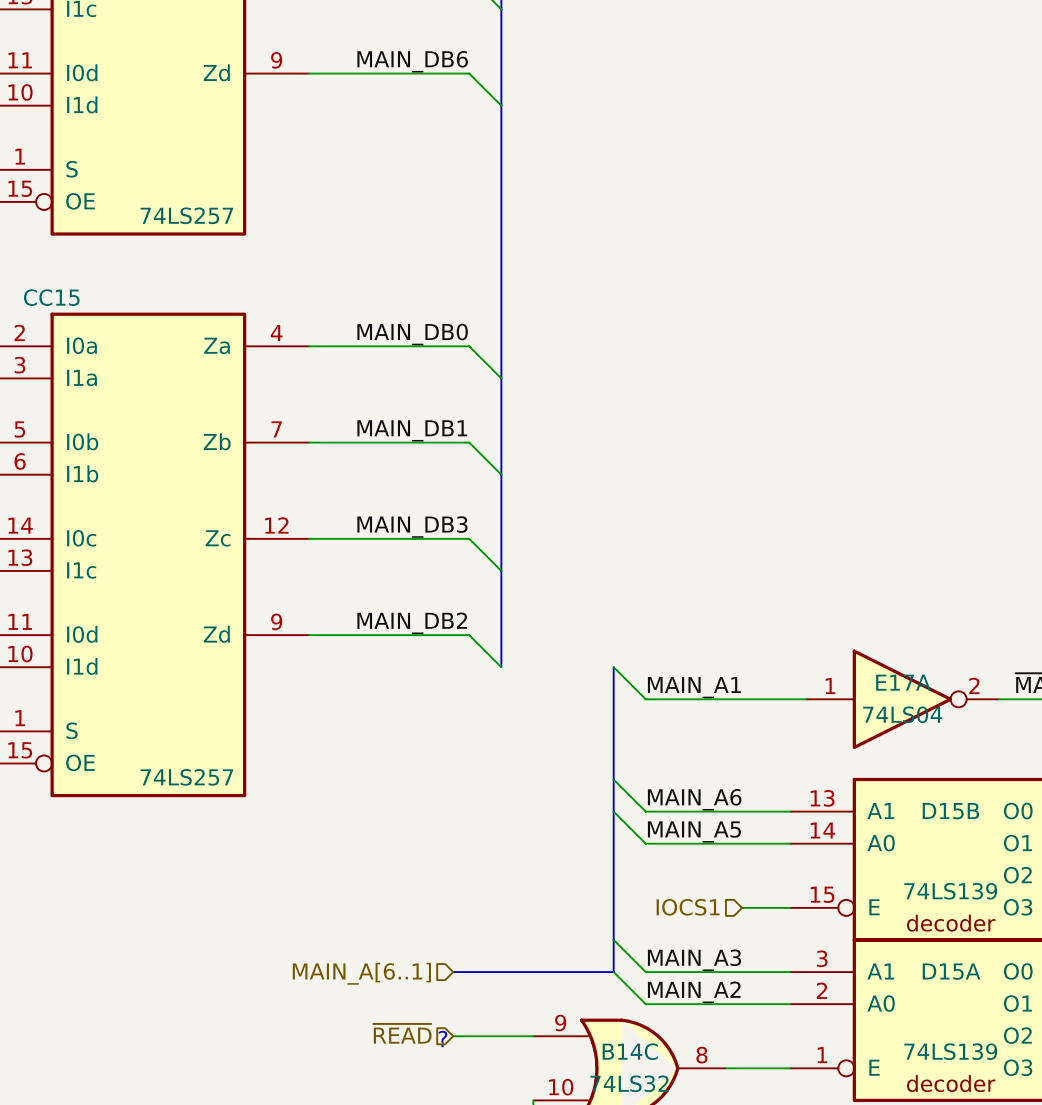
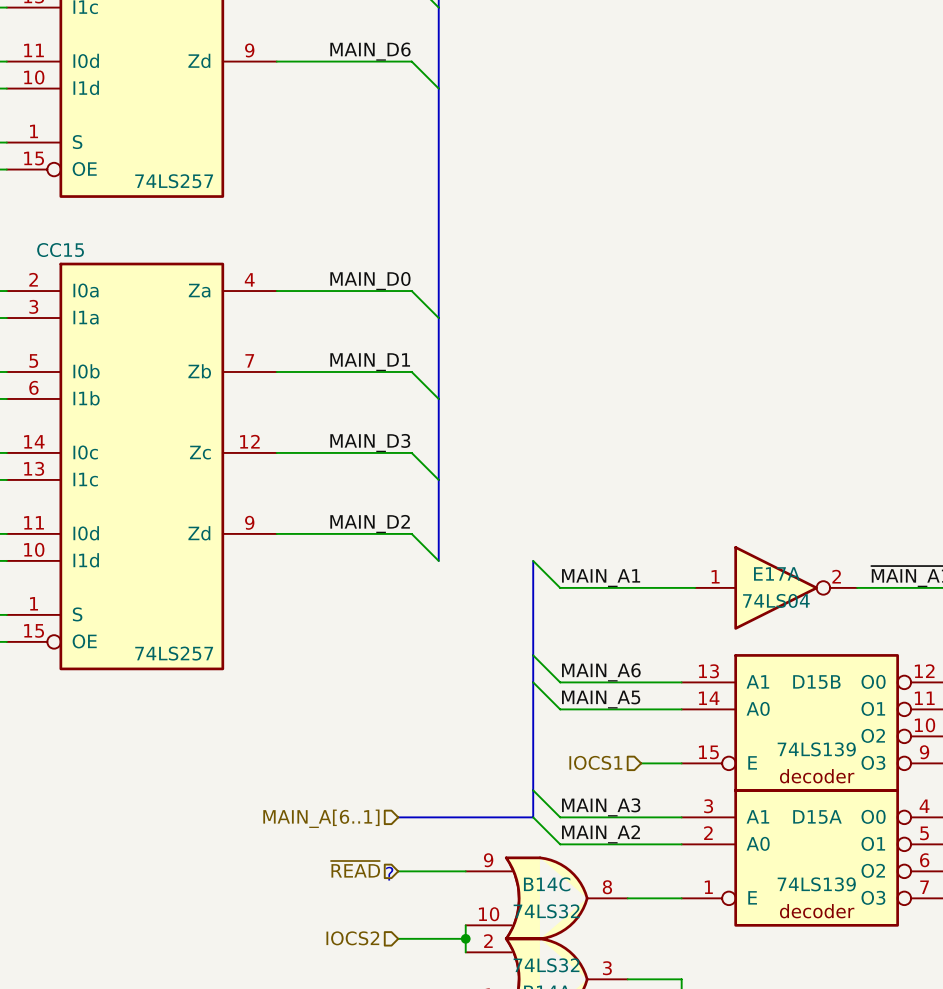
label: MAIN_DB6 (412, 61) -> MAIN_D6 (370, 51)
label: MAIN_DB0 (412, 334) -> MAIN_D0 (370, 281)
label: MAIN_DB1 (412, 430) -> MAIN_D1 (370, 362)
label: MAIN_DB3 (412, 526) -> MAIN_D3 (370, 442)
label: MAIN_DB2 (412, 623) -> MAIN_D2 (370, 523)

